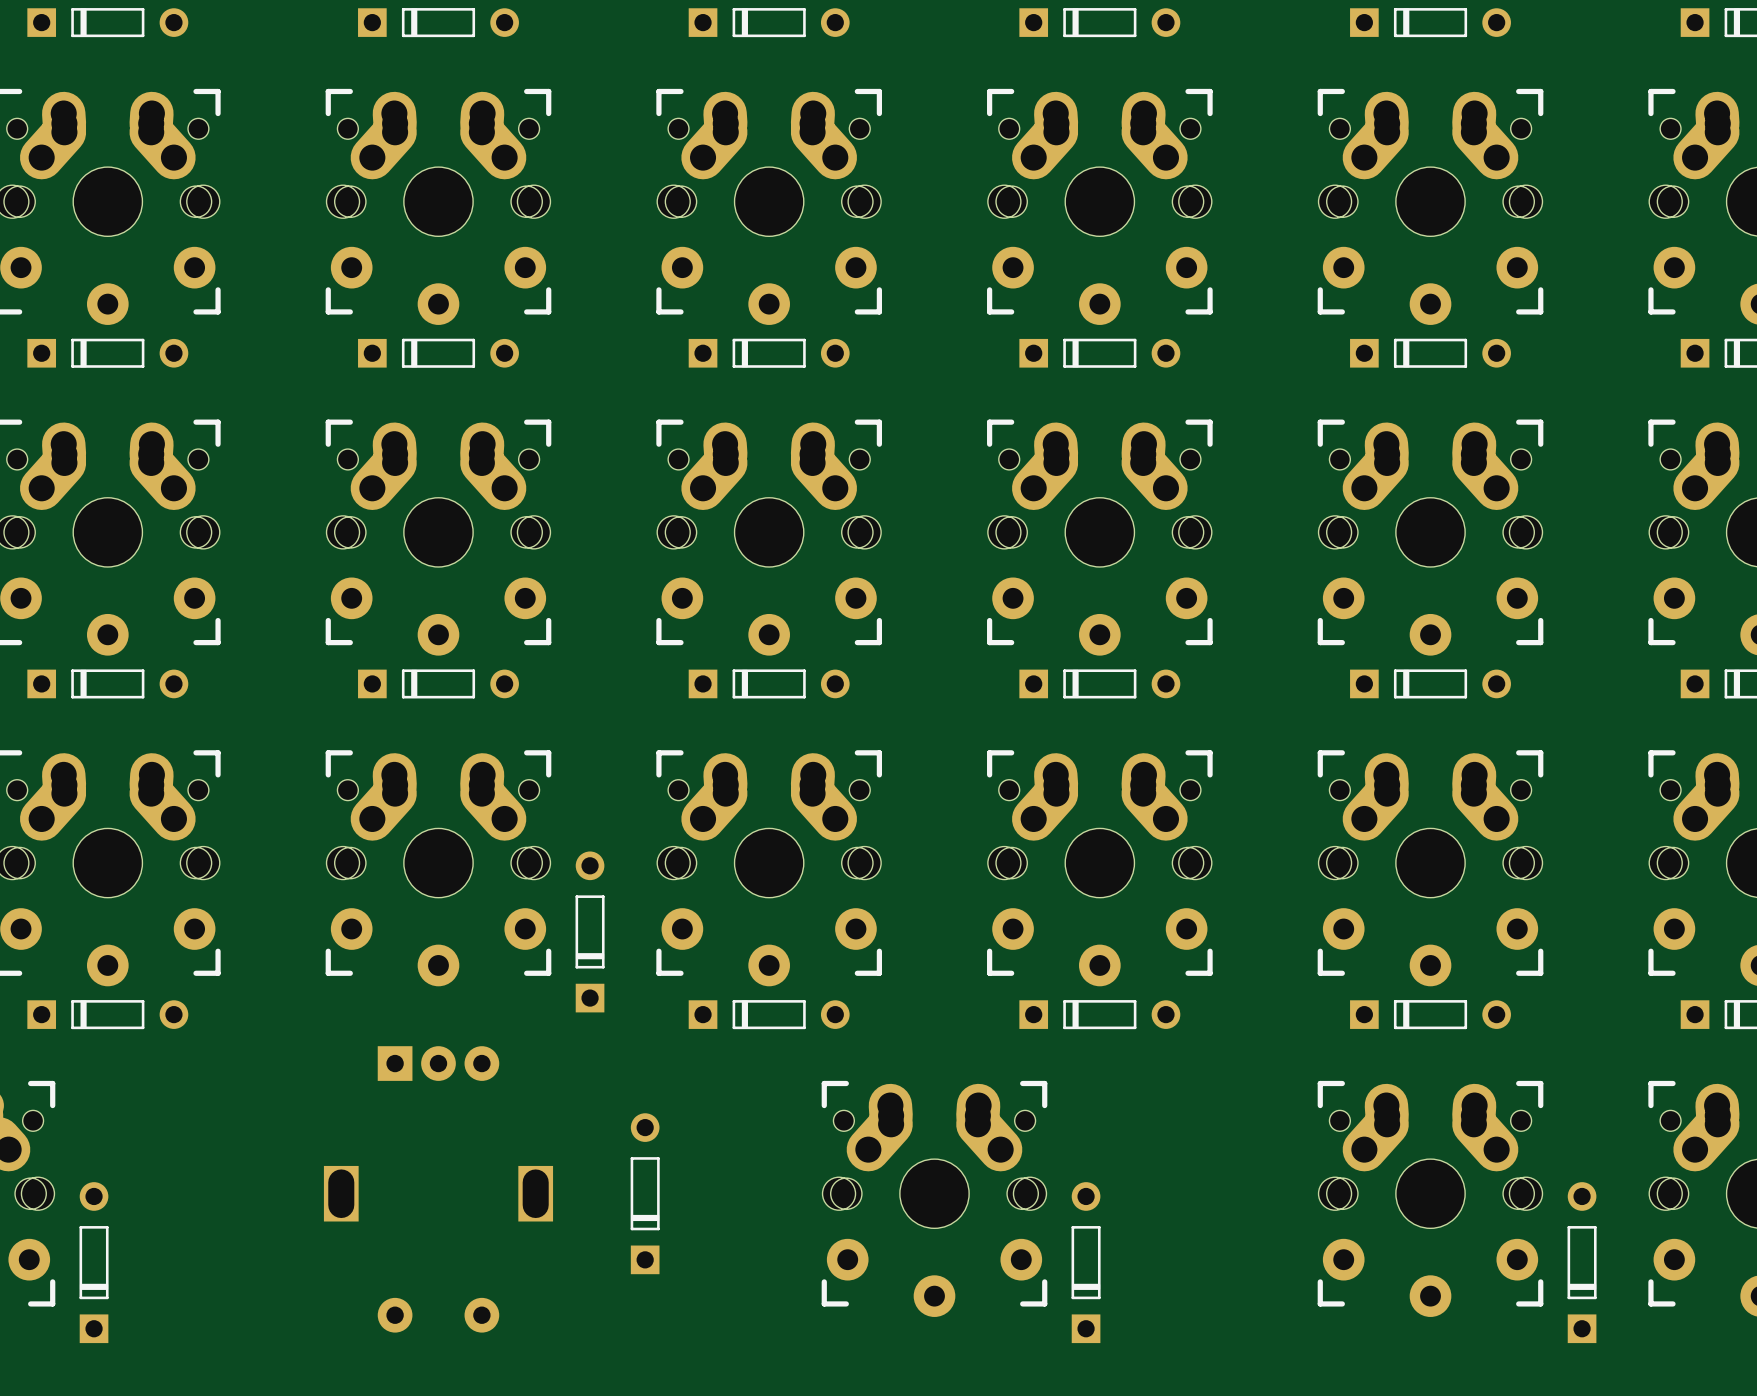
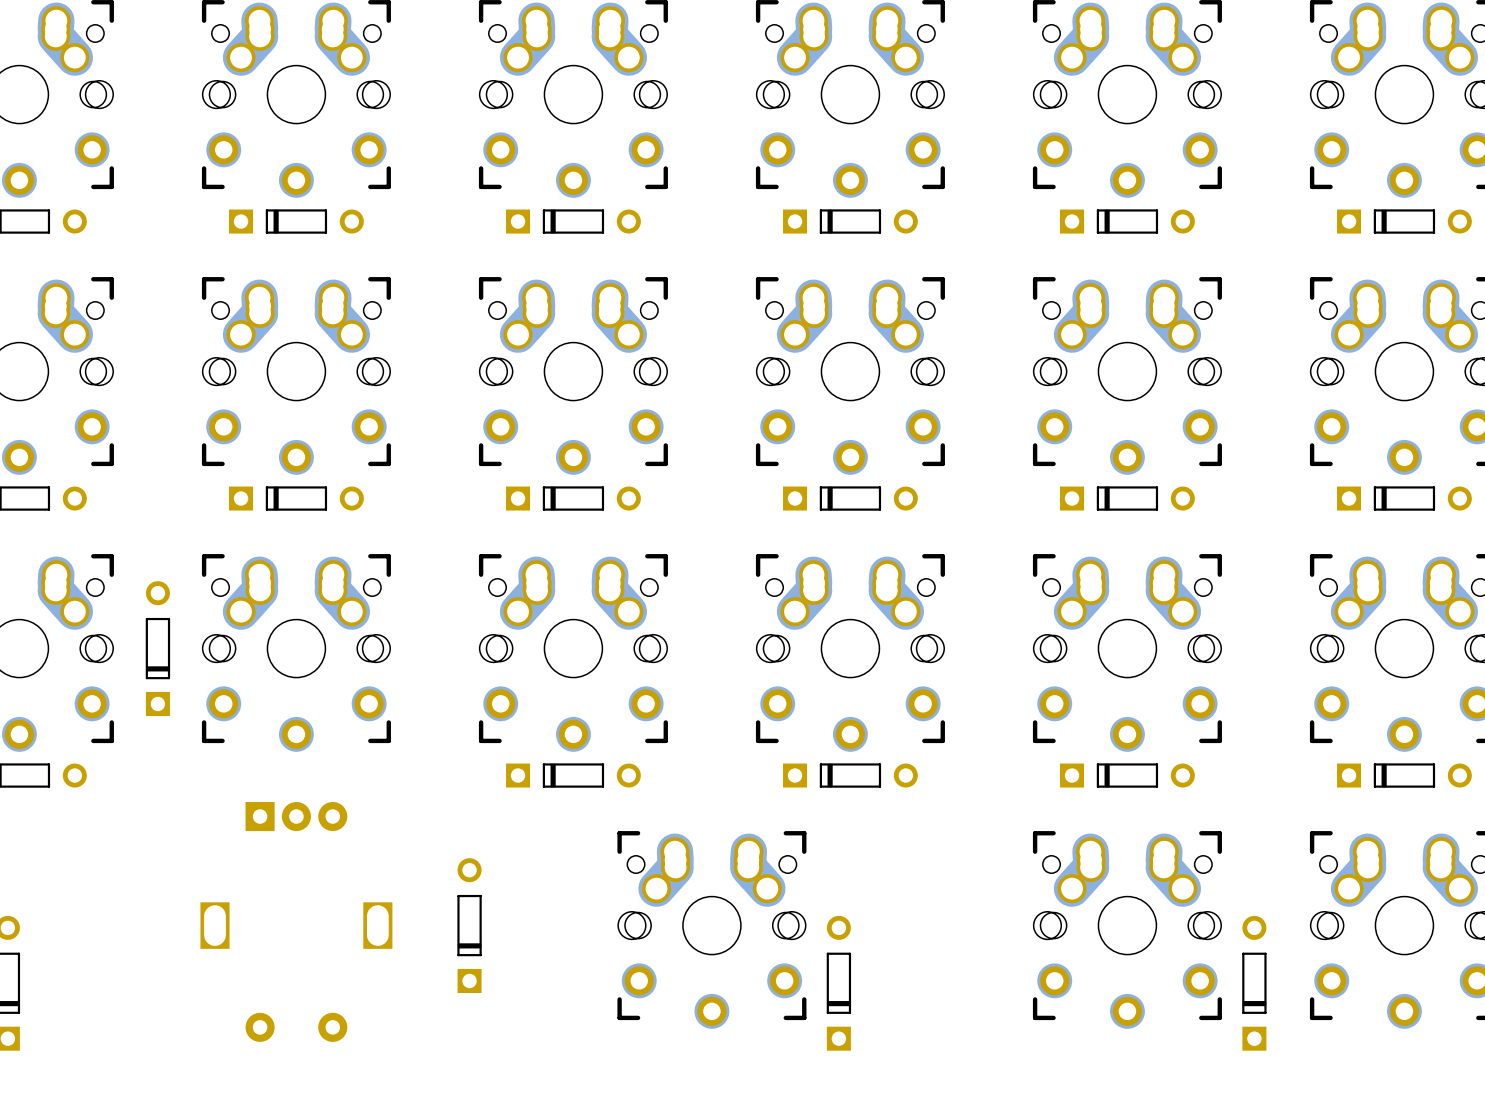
part position: (590, 931) -> (157, 648)

